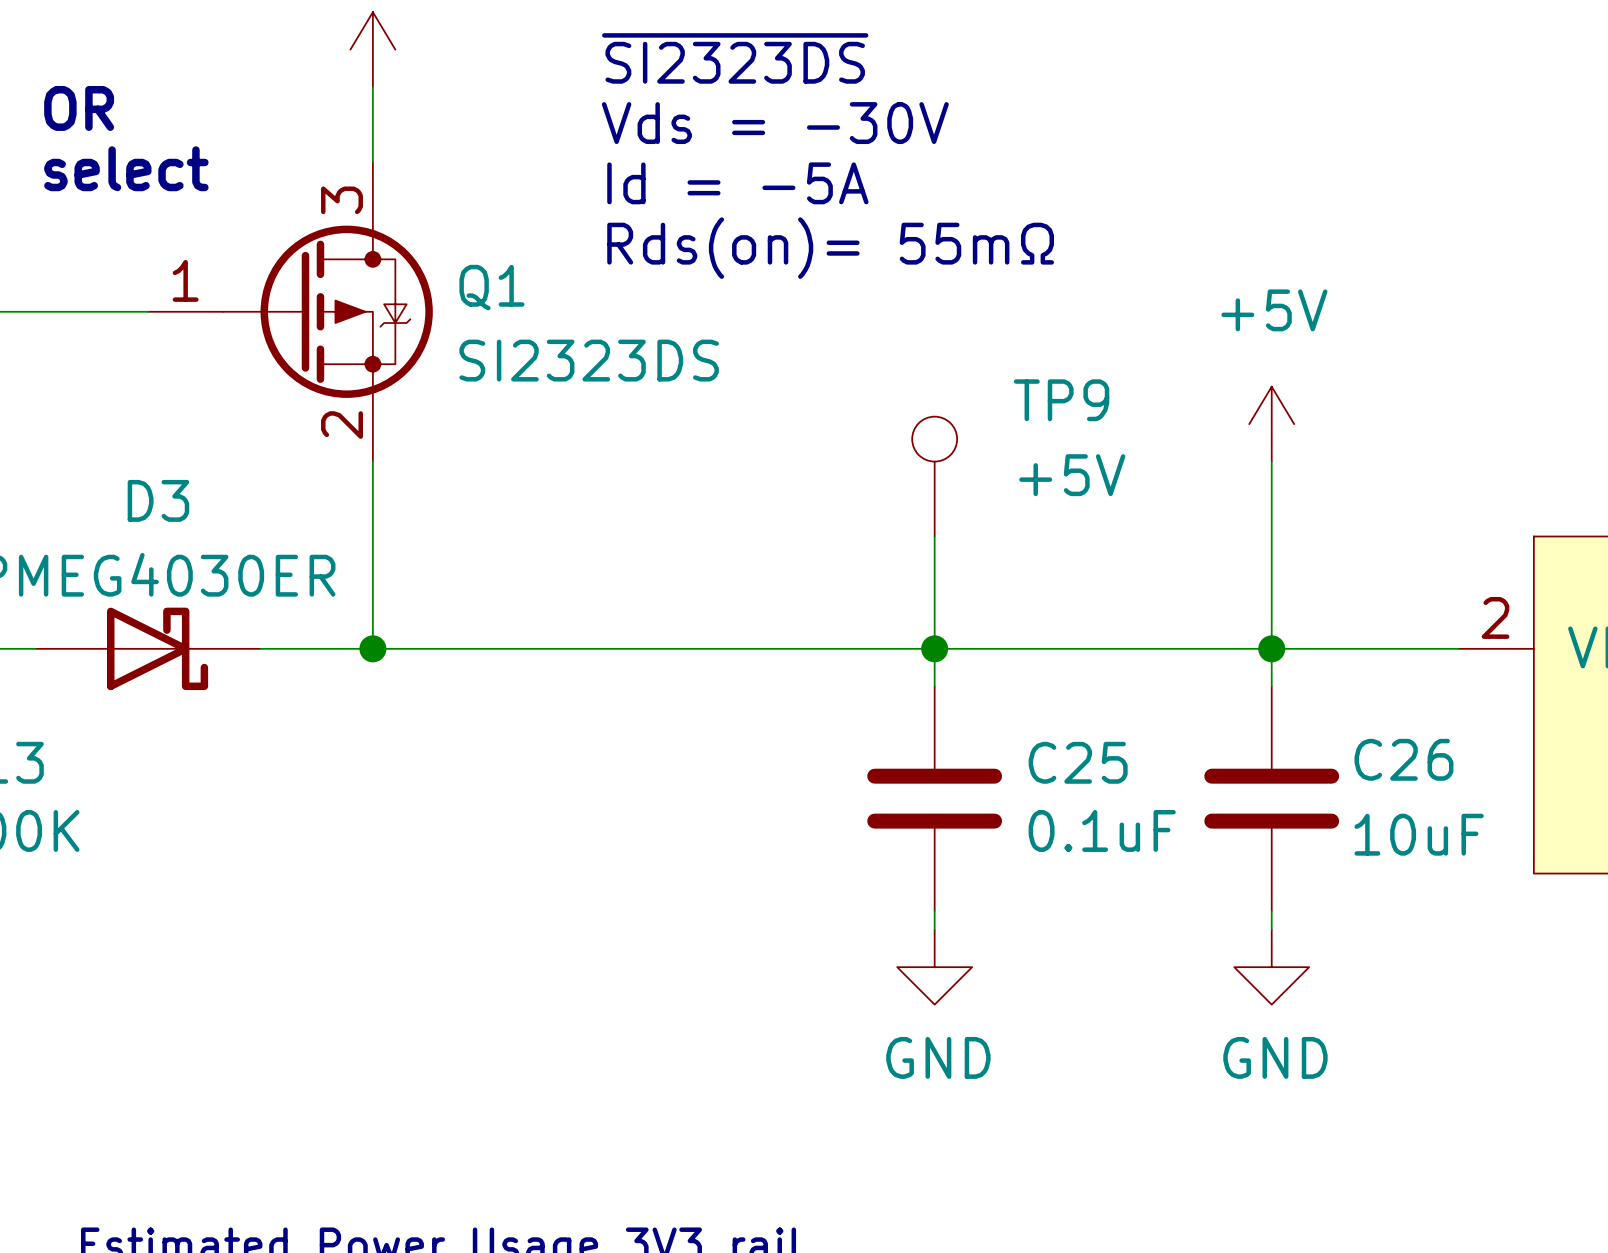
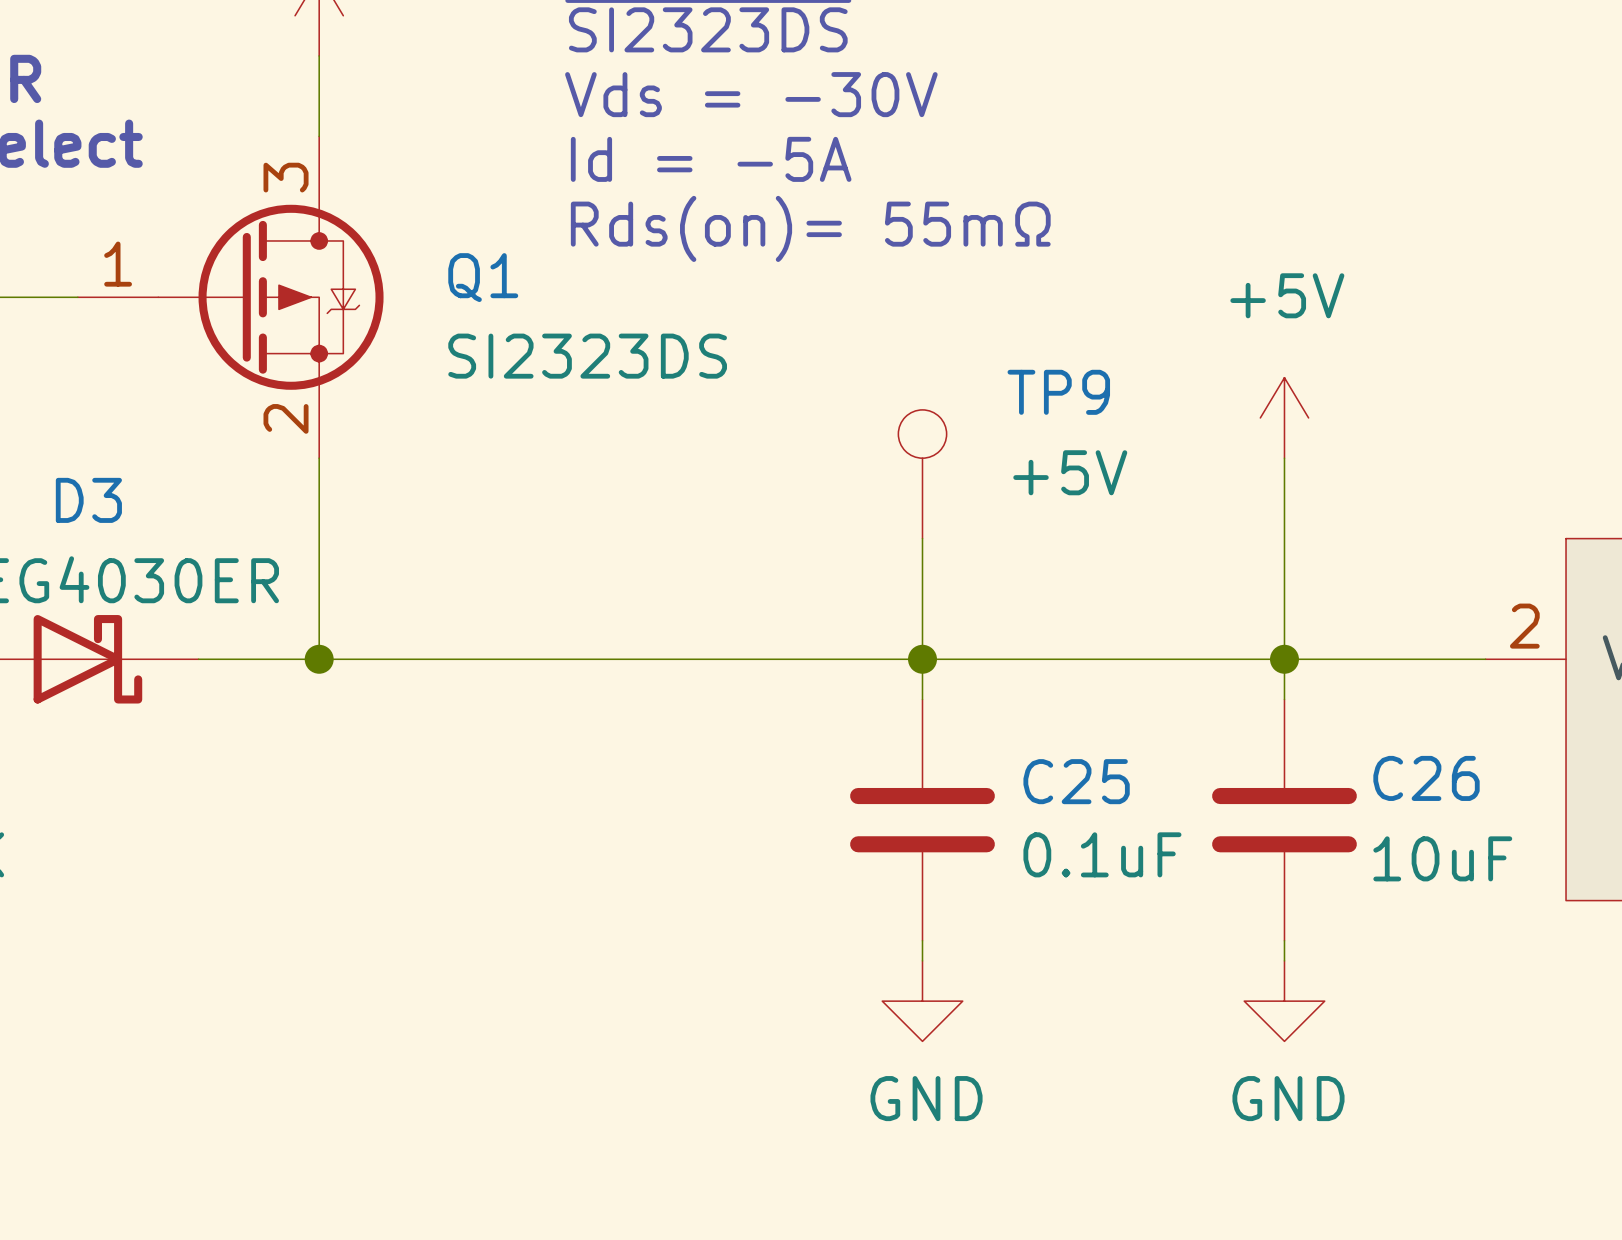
Q1 name position: Q1 (491, 287) -> Q1 (483, 277)
Q1 value position: SI2323DS (589, 360) -> SI2323DS (587, 356)

